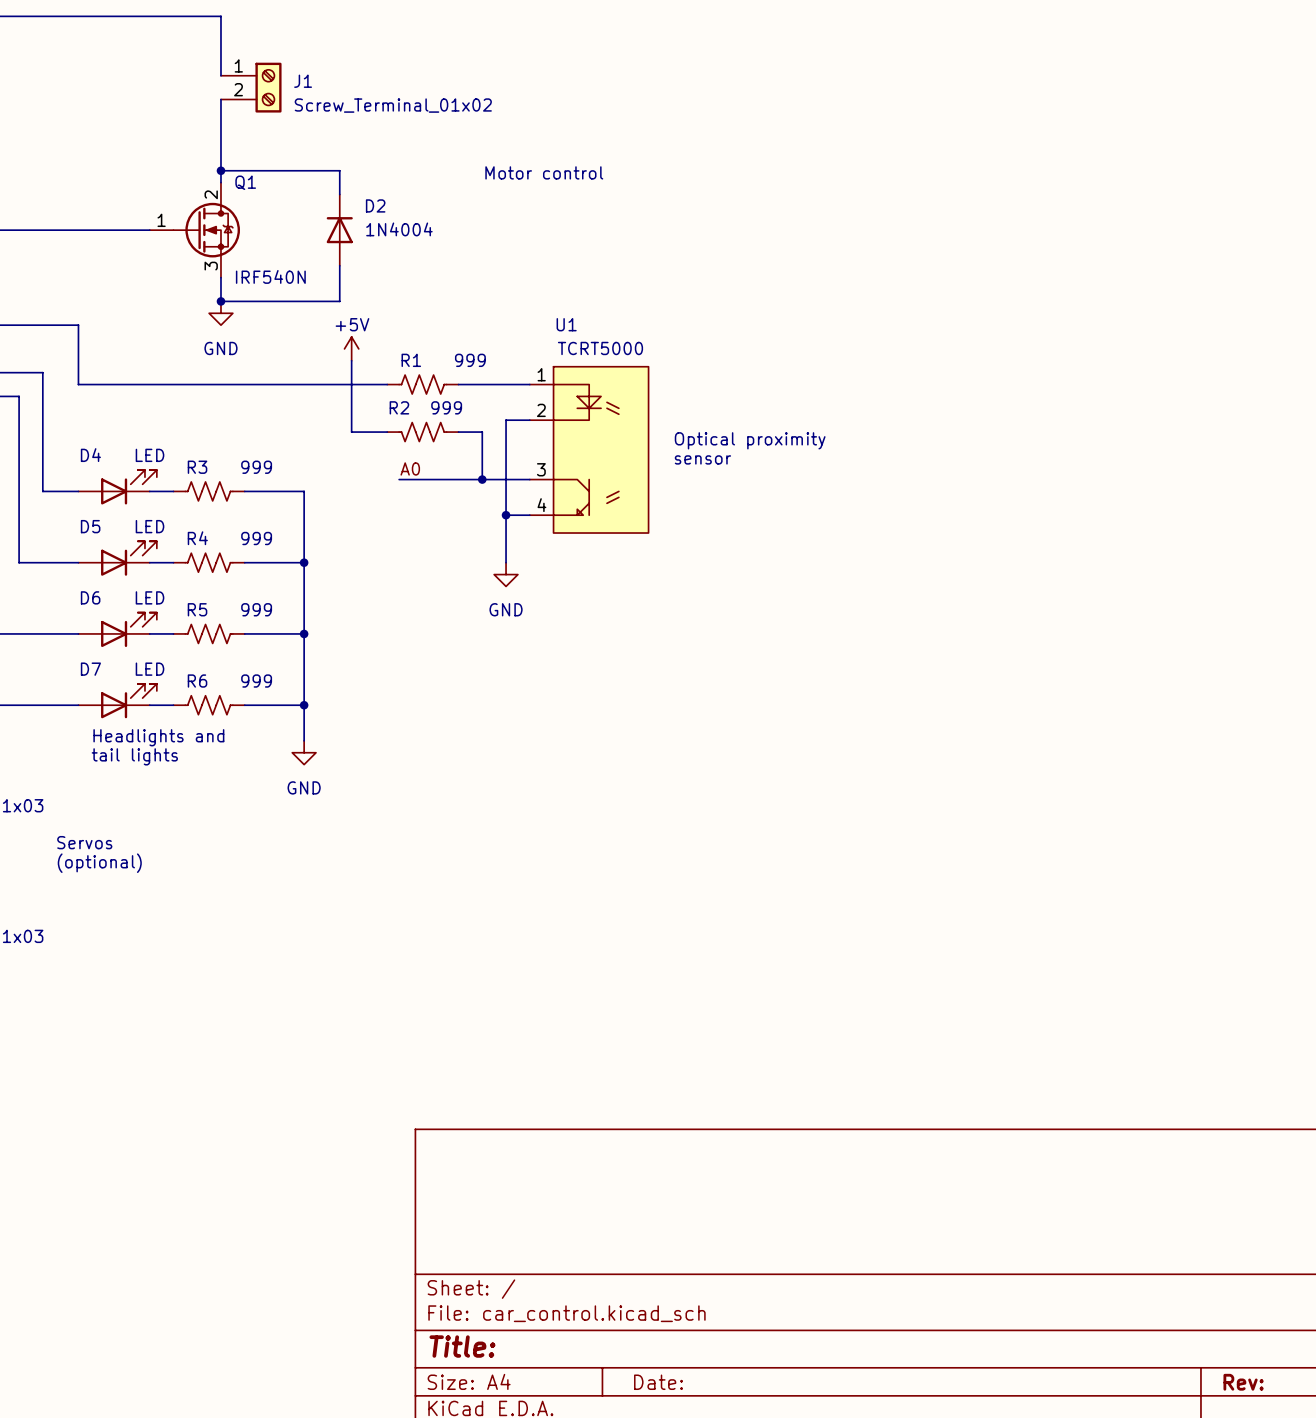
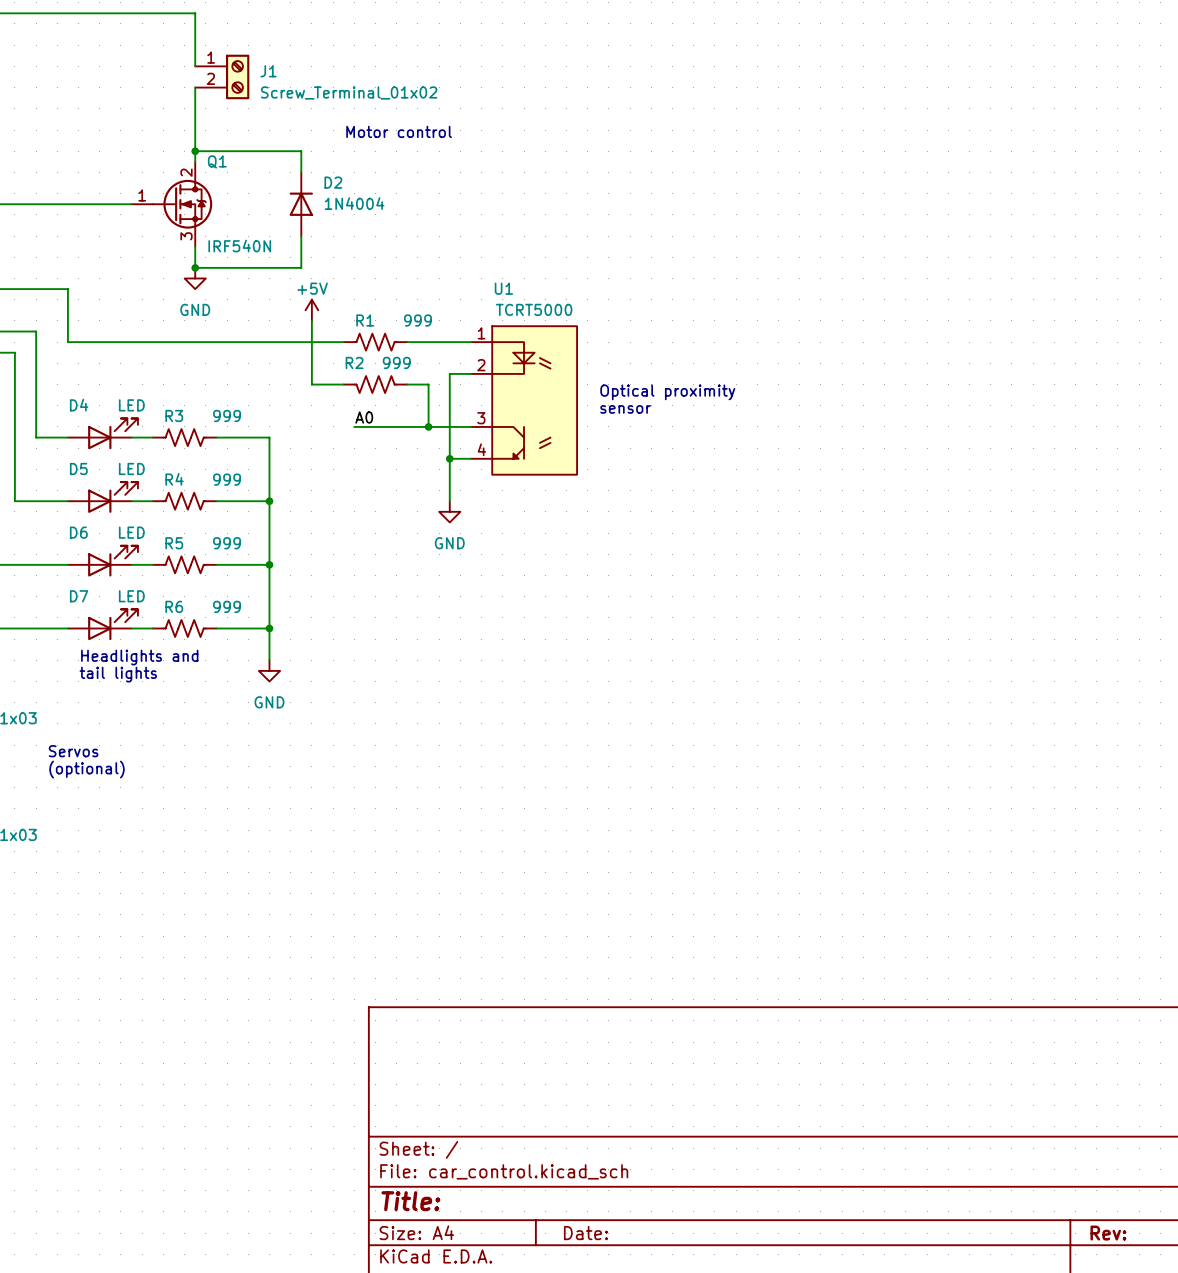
text position: Motor control (544, 172) -> Motor control (399, 131)

